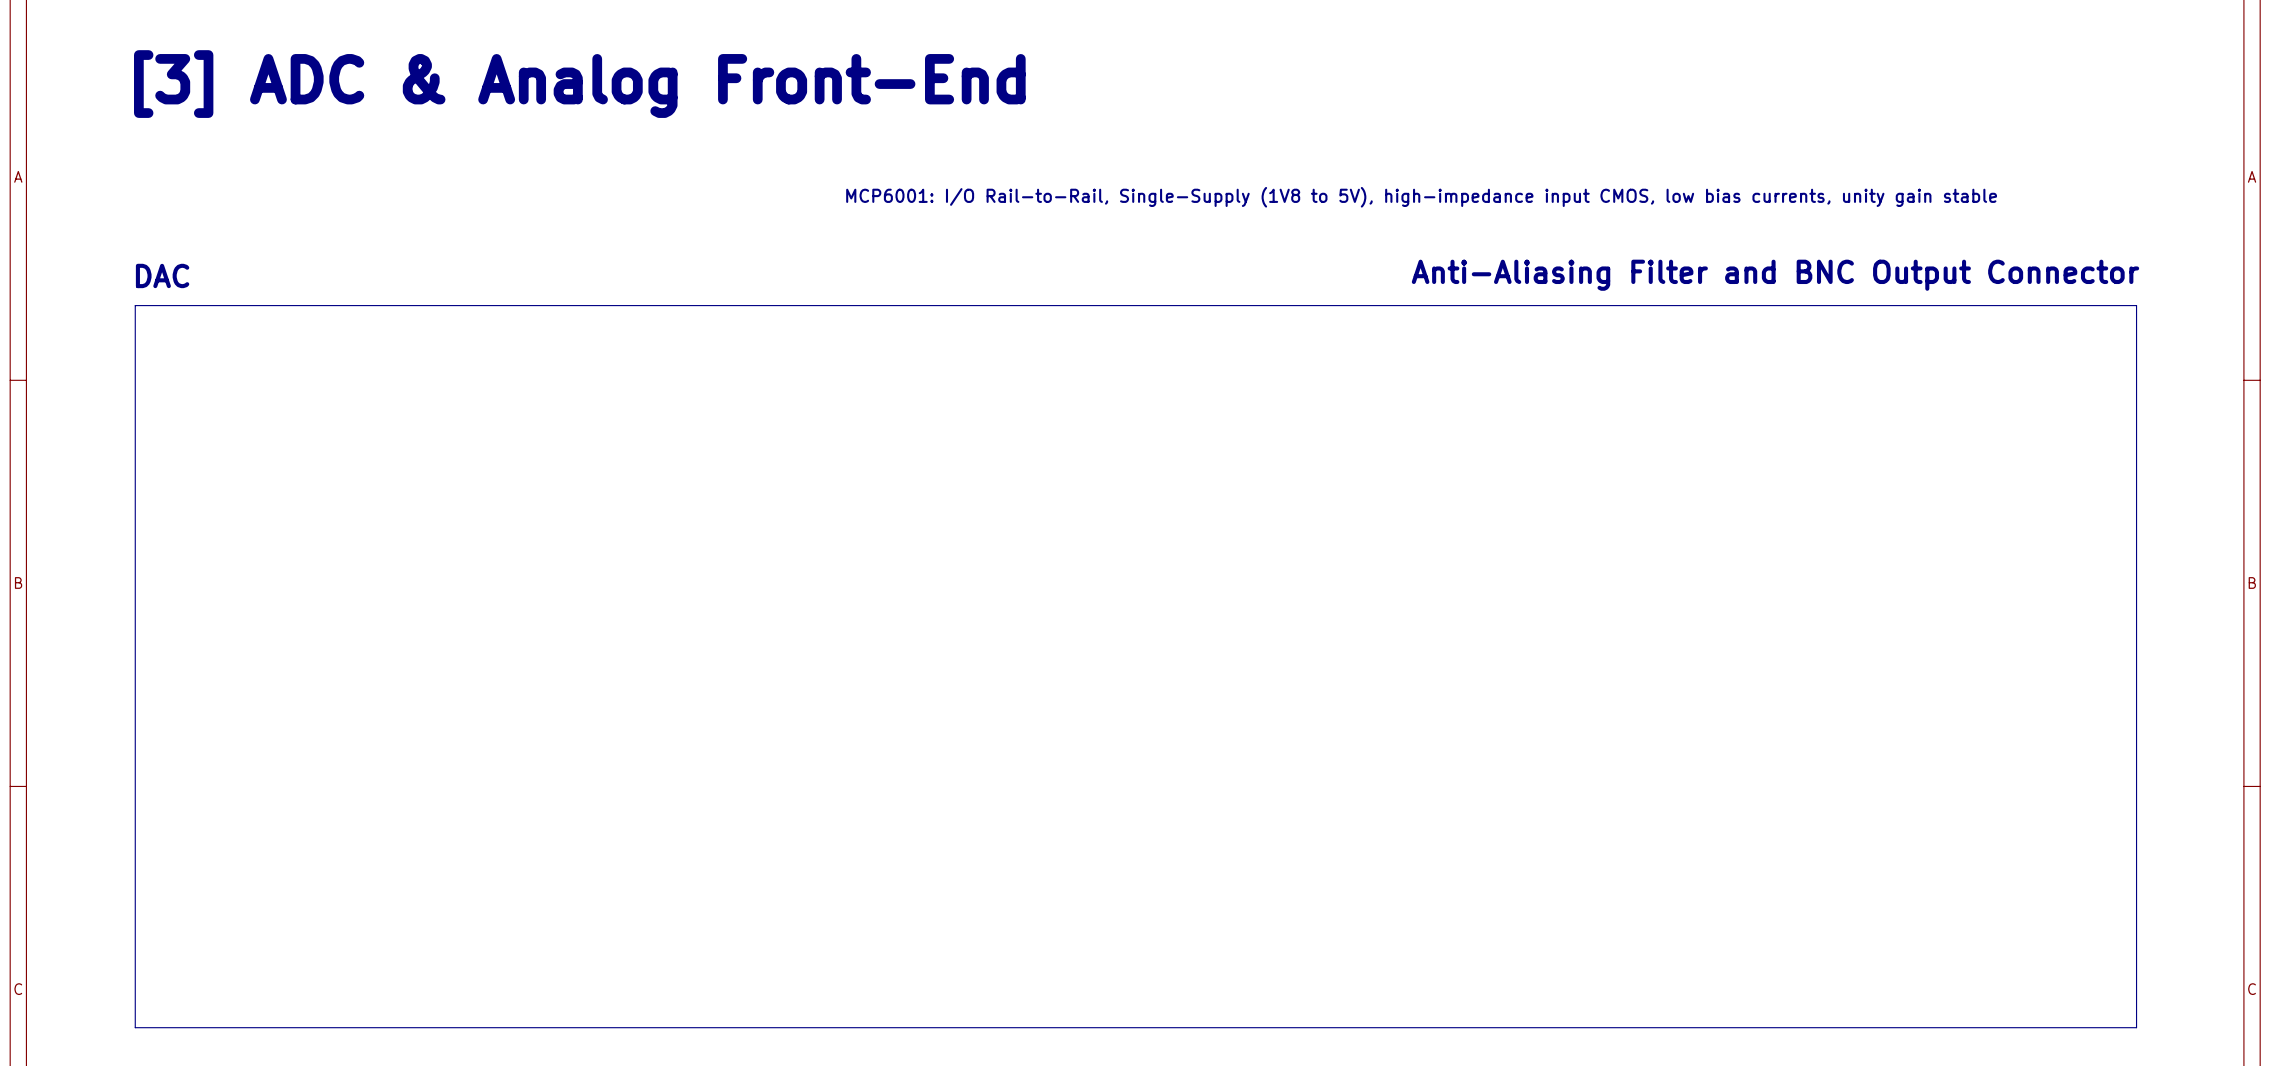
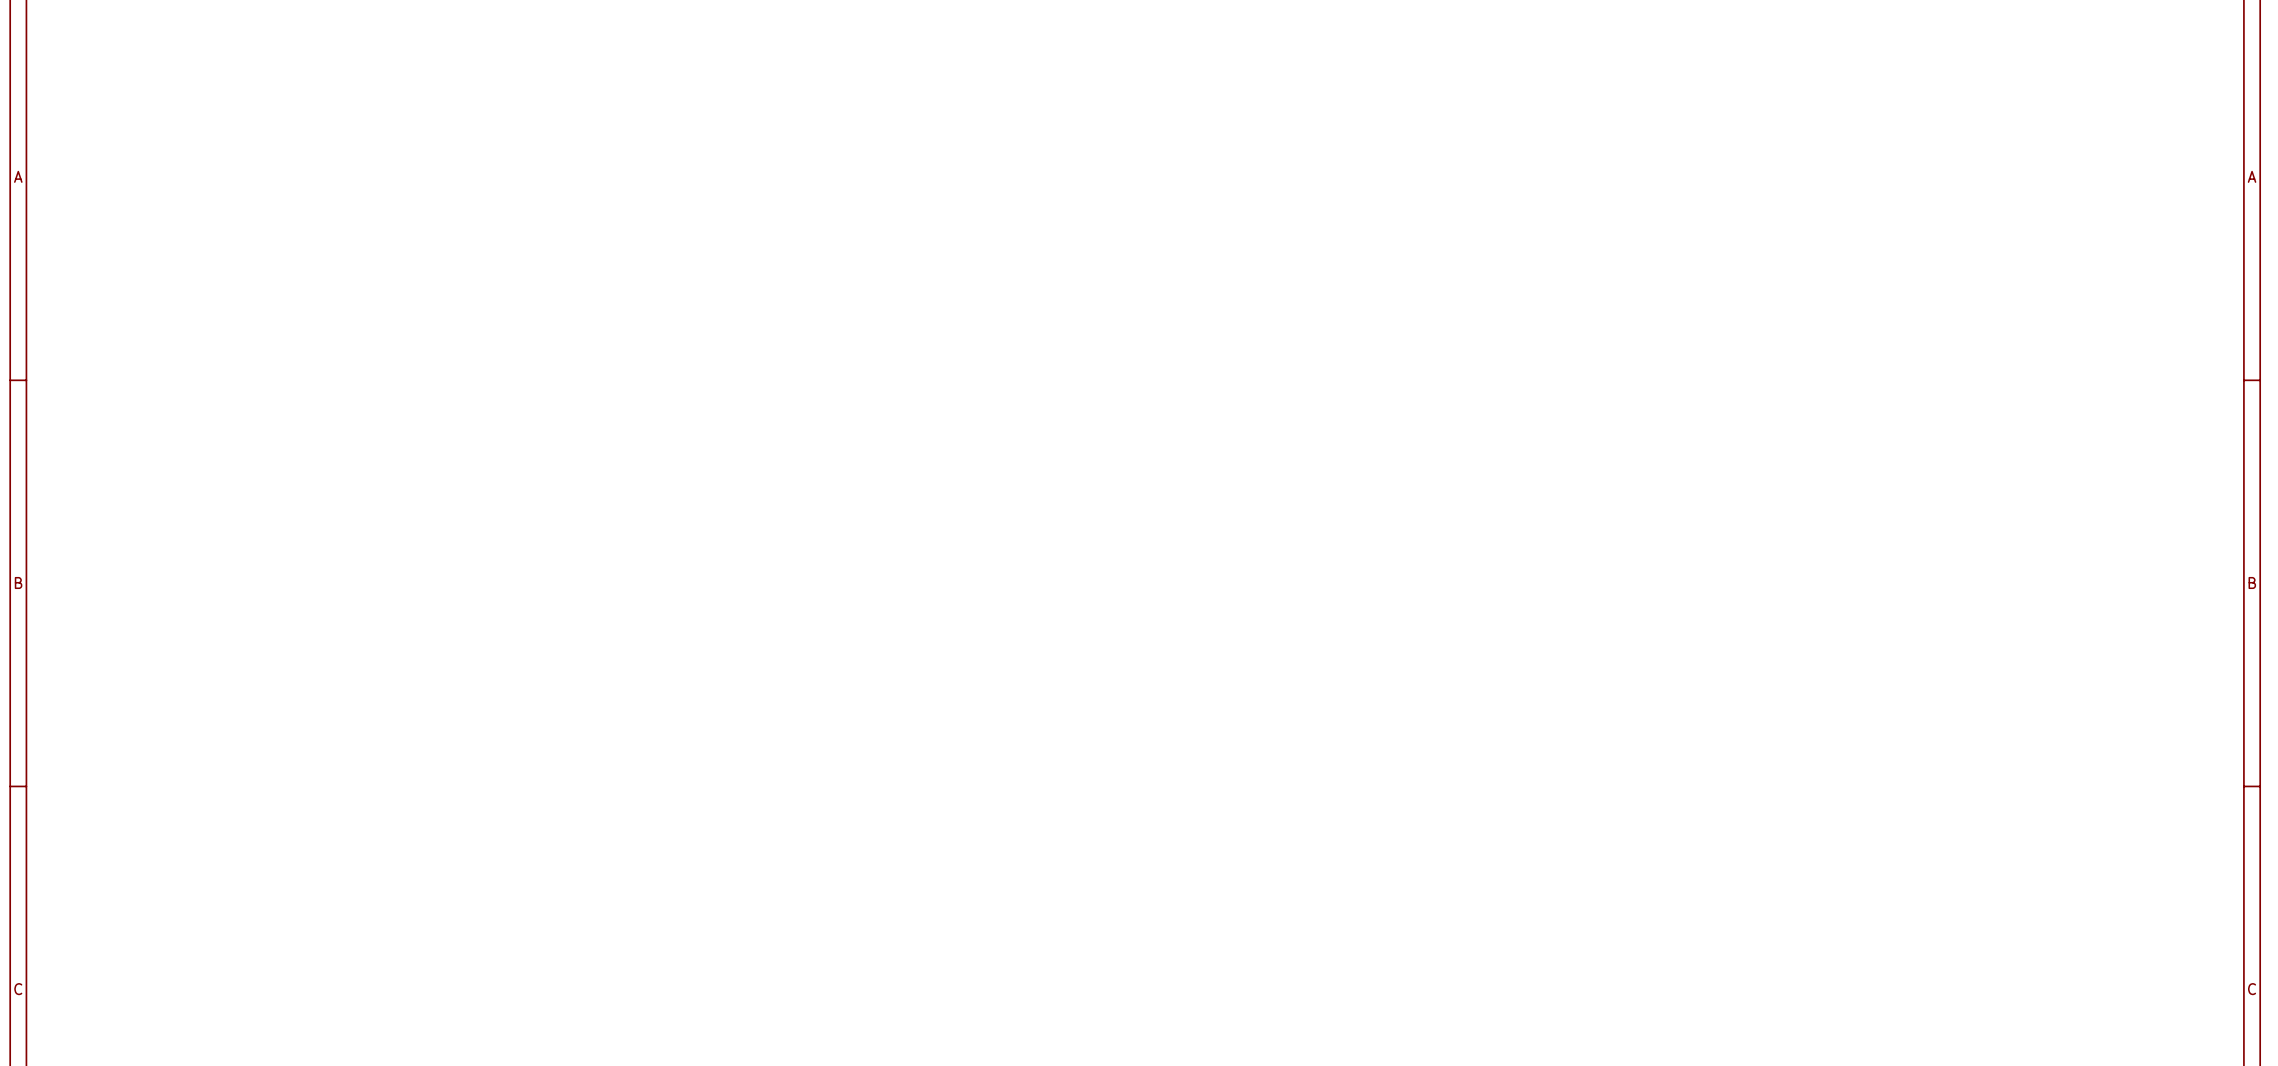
text: [3] ADC & Analog Front-End (579, 84) -> none
text: MCP6001: I/O Rail-to-Rail, Single-Supply (1V8 to 5V), high-impedance input CMOS, low bias currents, unity gain stable (1421, 197) -> none
text: DAC (162, 275) -> none
text: Anti-Aliasing Filter and BNC Output Connector (1775, 275) -> none
line: (135, 305) (2136, 305) (2136, 1027) (135, 1027) (135, 305) -> none

